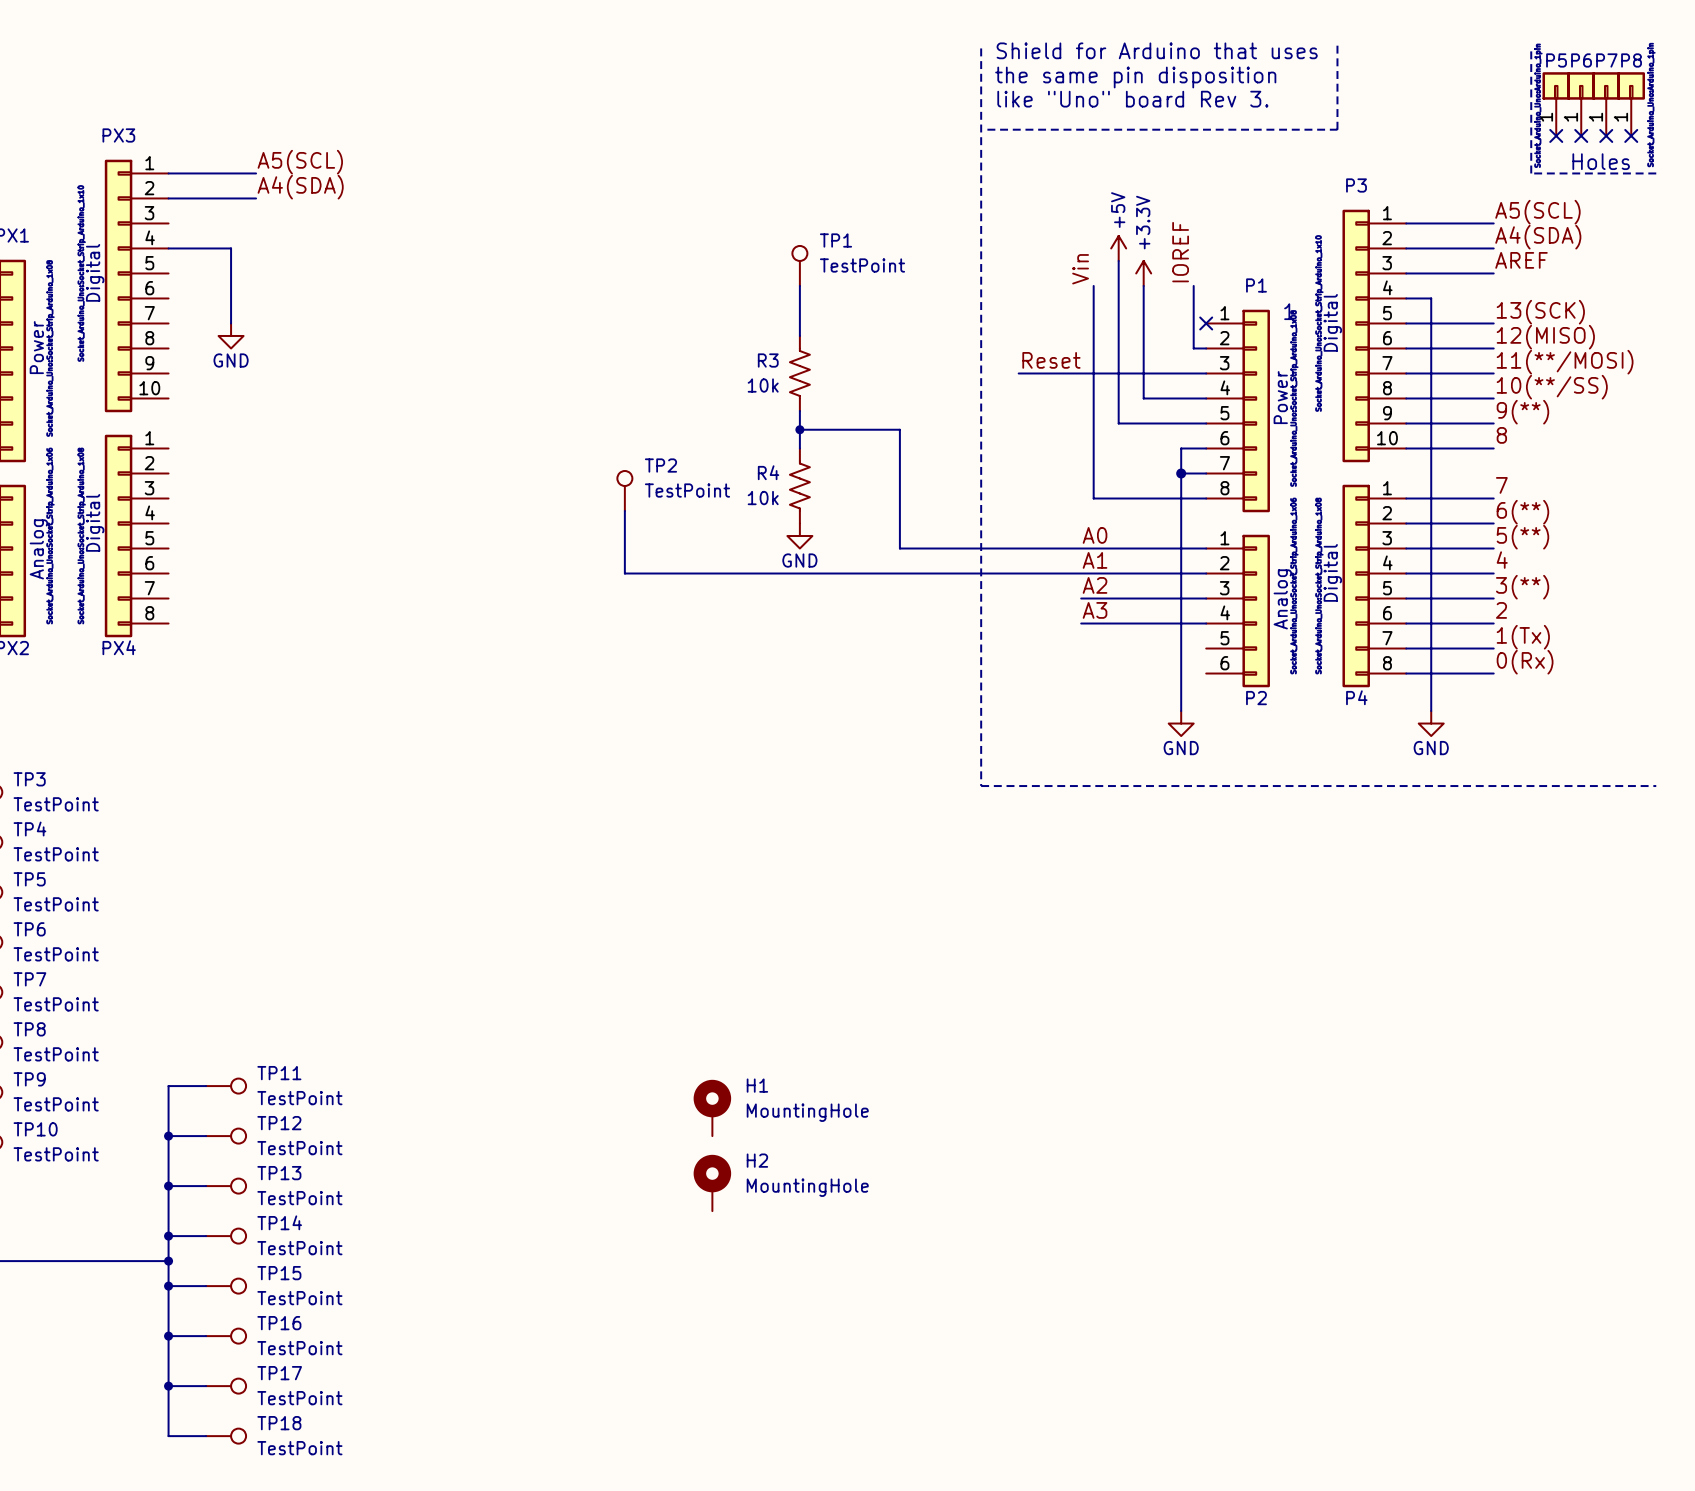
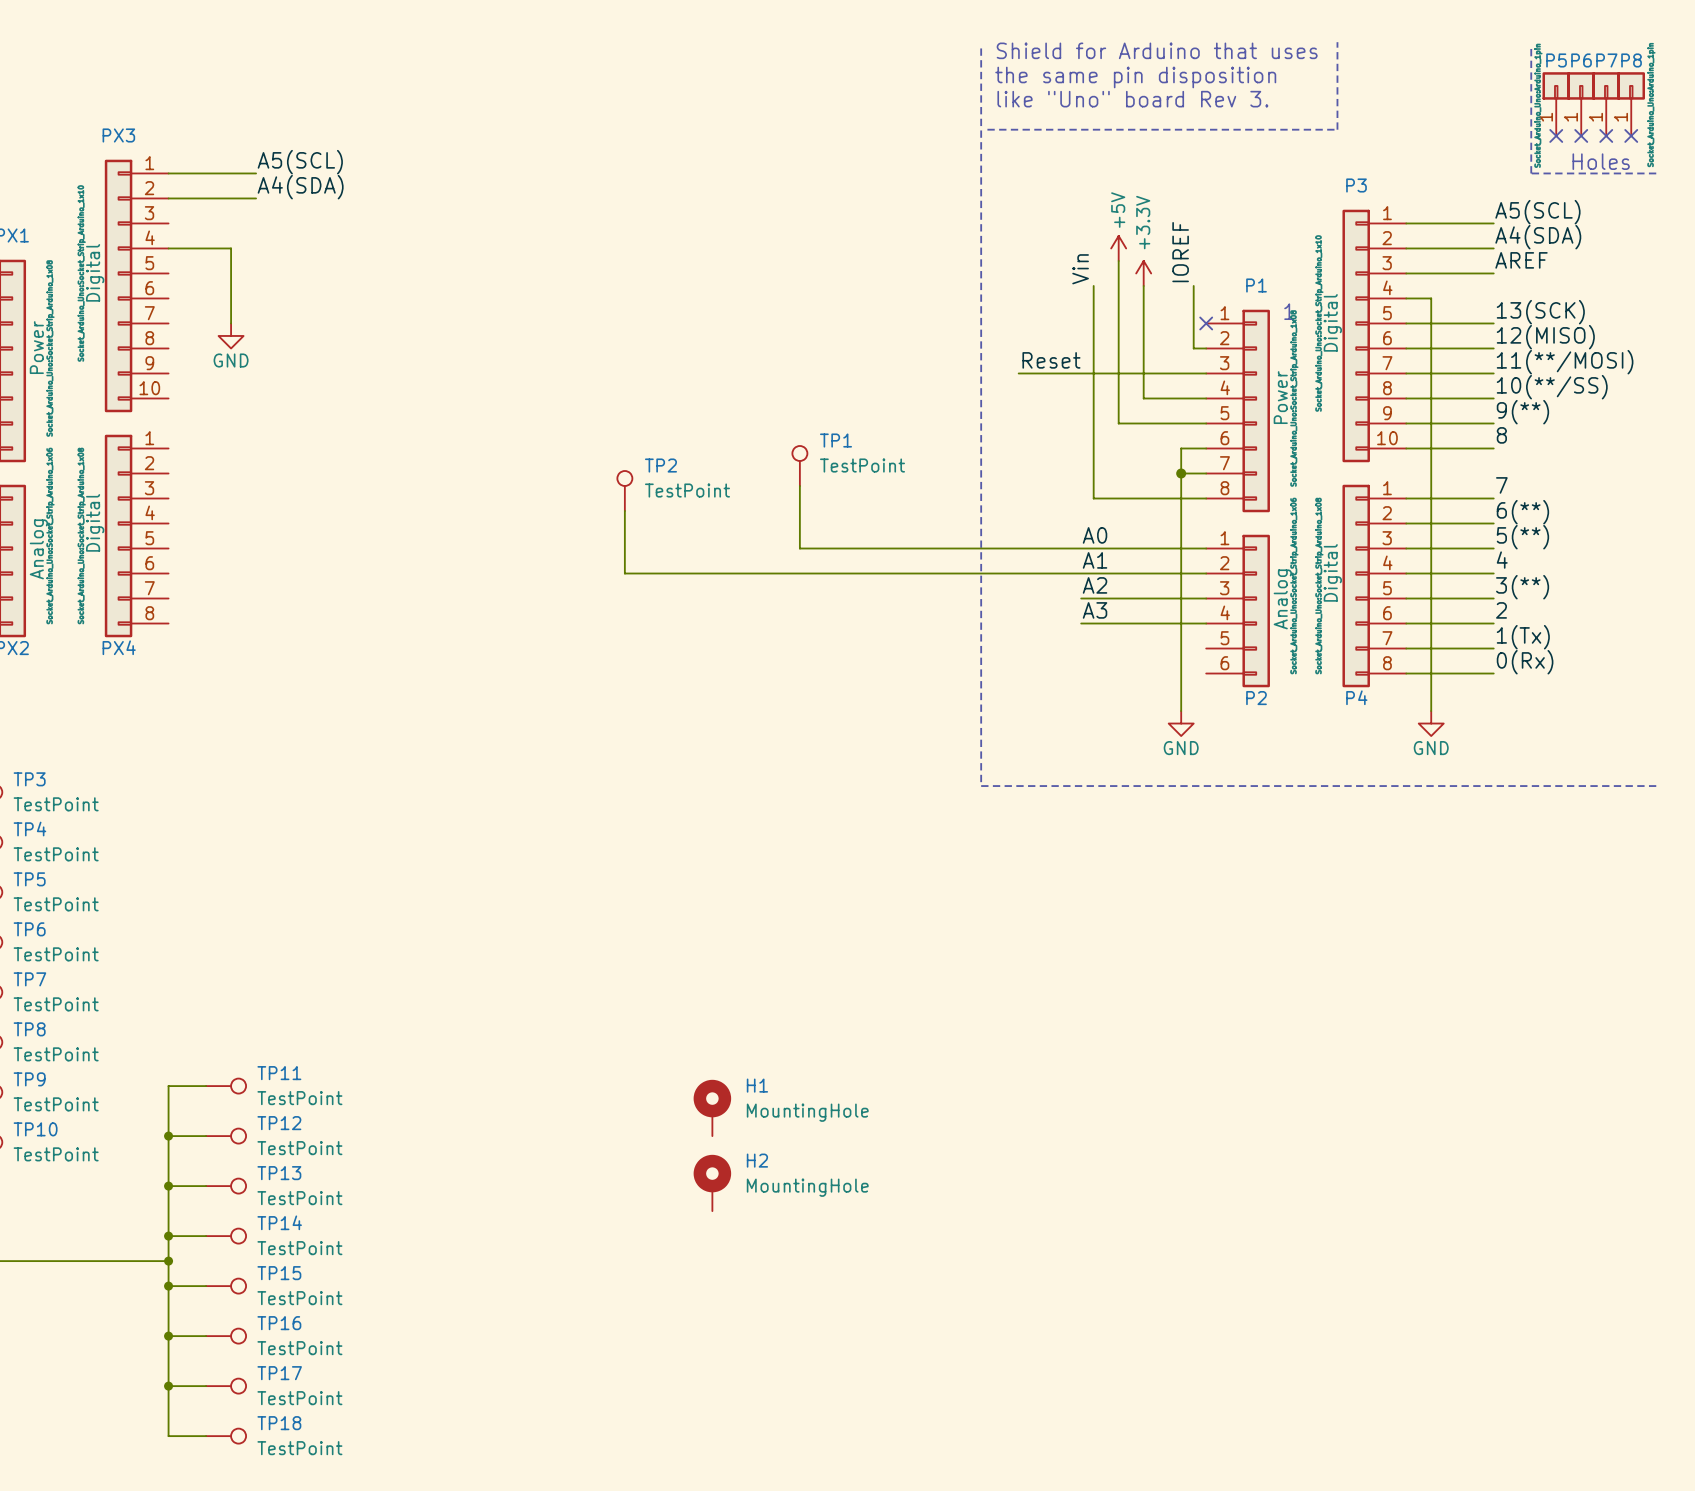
TP1 position: (799, 265) -> (799, 465)
wire: (799, 285) (799, 335) -> none
R3: 10k (799, 373) -> none
wire: (799, 410) (799, 448) -> none
wire: (799, 429) (899, 429) (899, 548) -> (799, 485) (799, 548) (899, 548)
junction: (799, 429) -> none
R4: 10k (799, 485) -> none
power symbol: GND (799, 536) -> none

